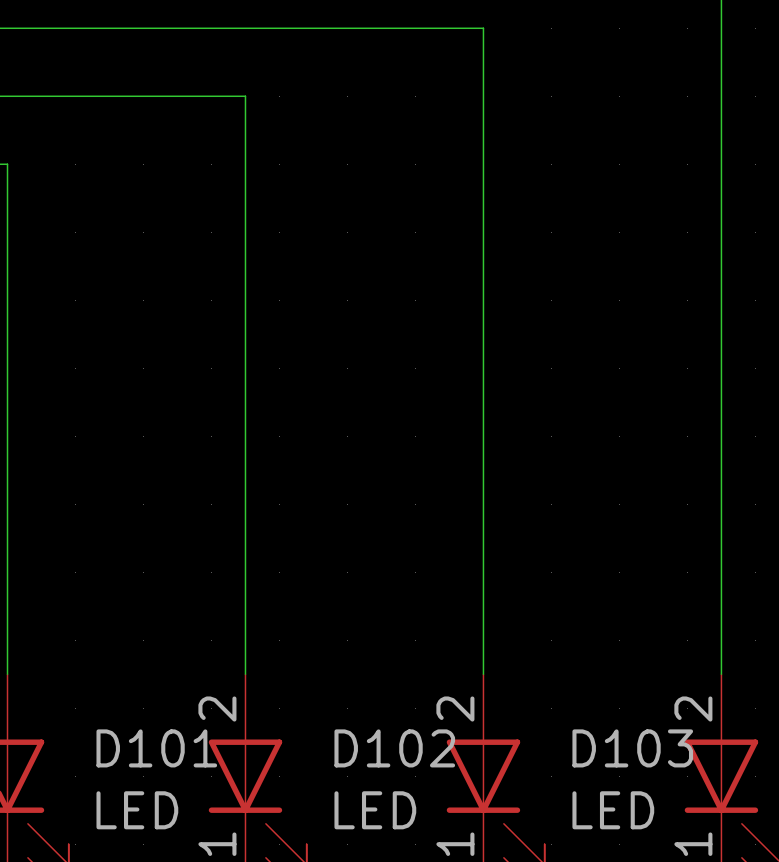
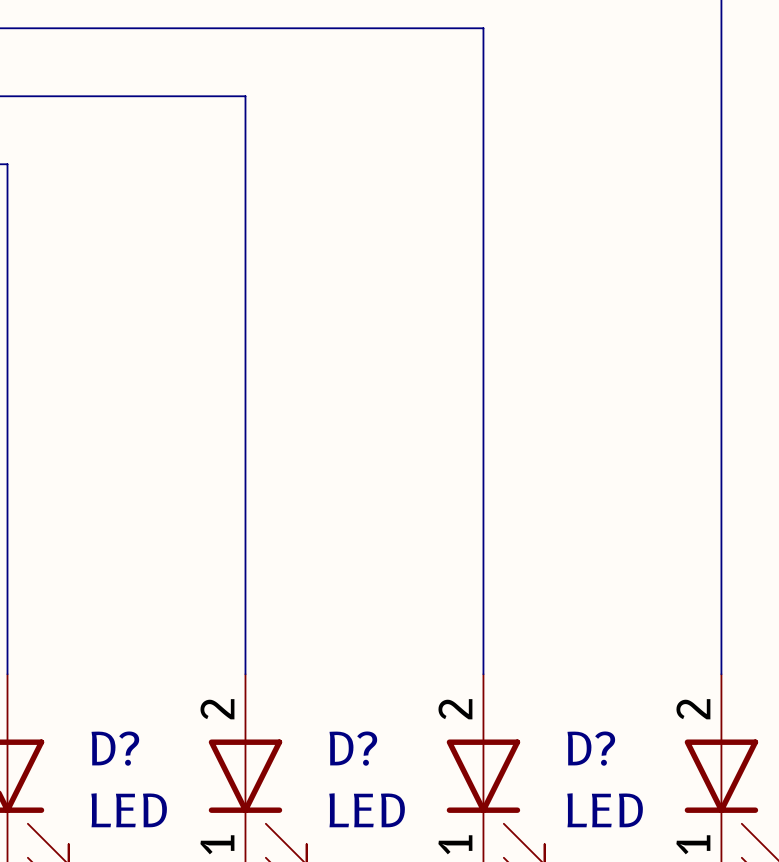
D101 name: D101 (156, 748) -> D? (115, 748)
D102 name: D102 (394, 748) -> D? (353, 748)
D103 name: D103 (632, 748) -> D? (591, 748)

